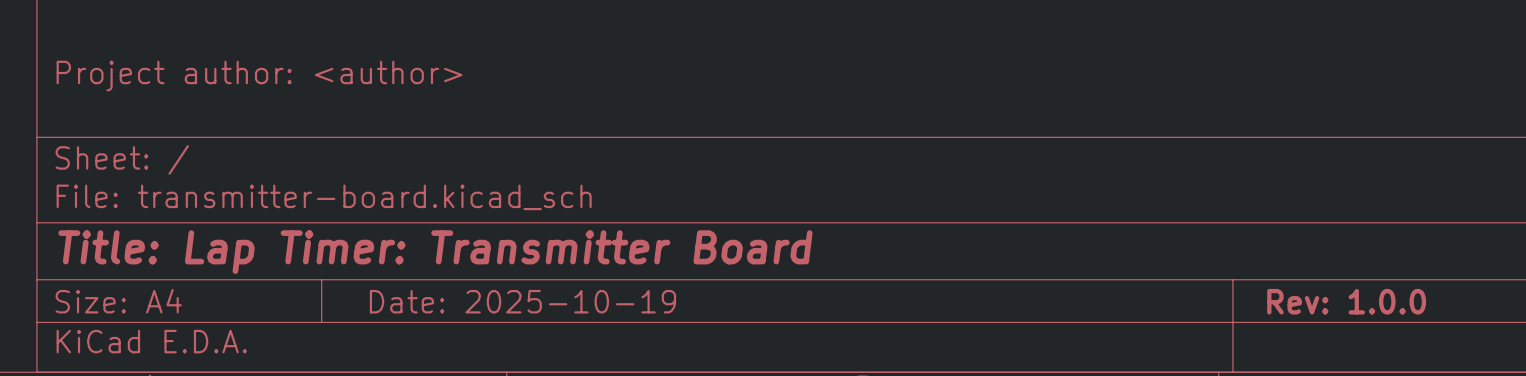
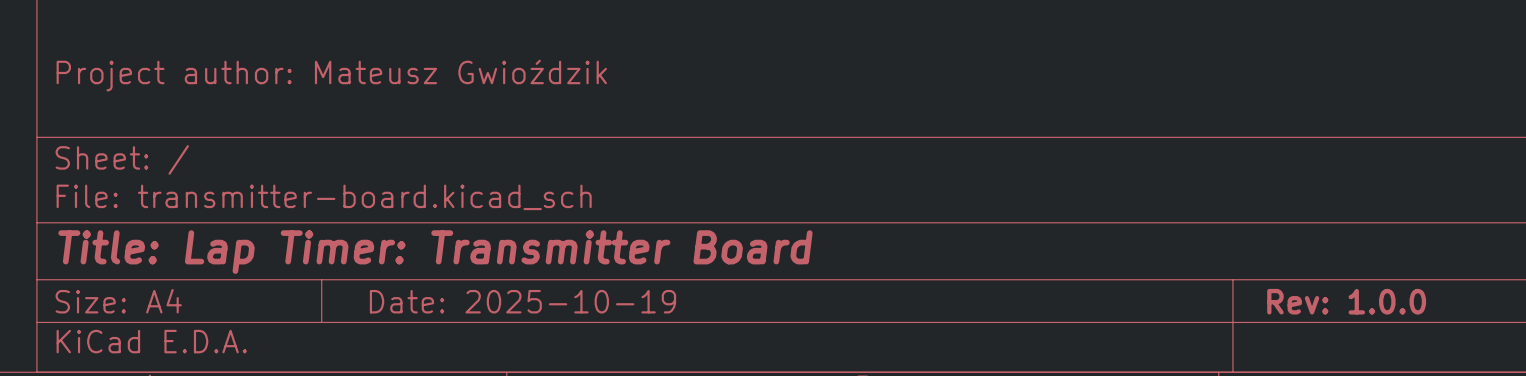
title block: Project author: <author> (259, 76) -> Project author: Mateusz Gwioździk (331, 75)

